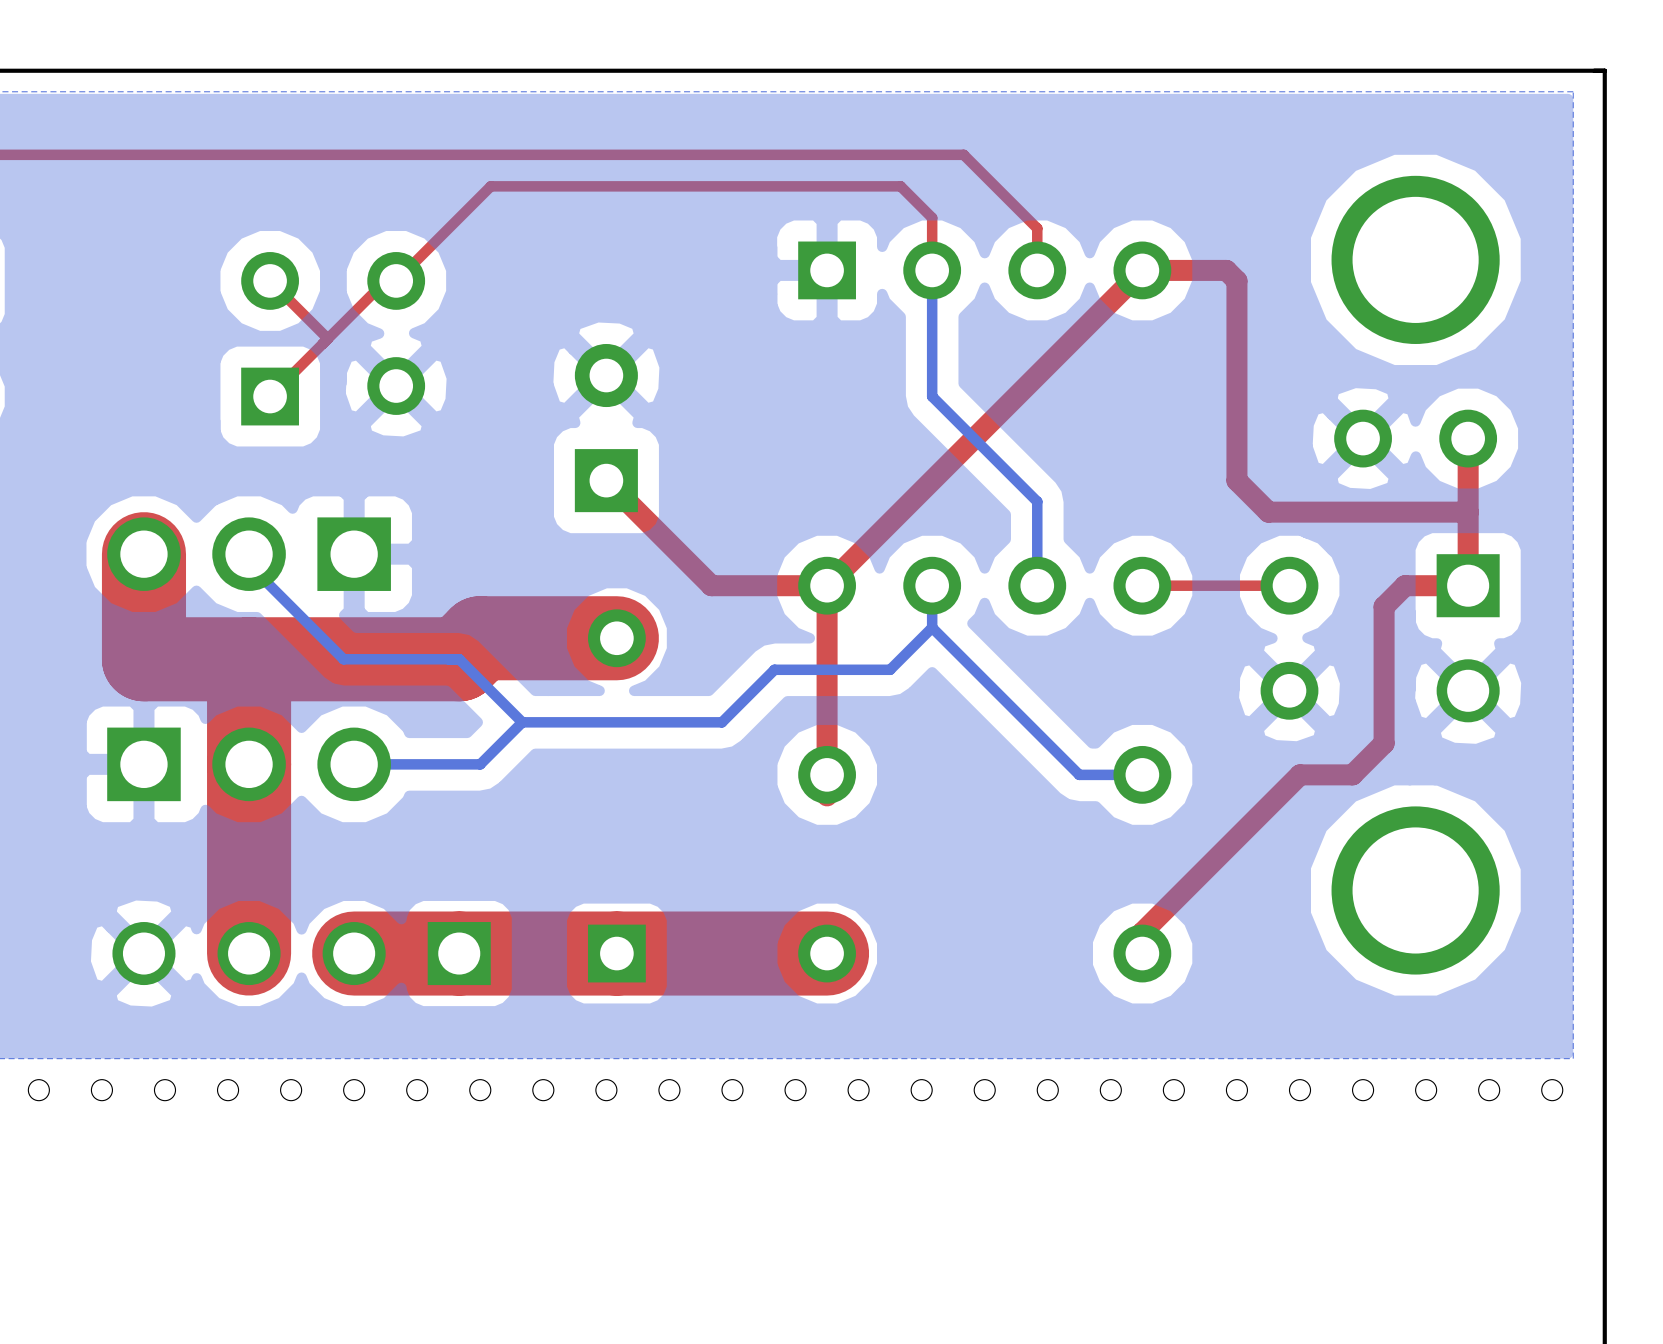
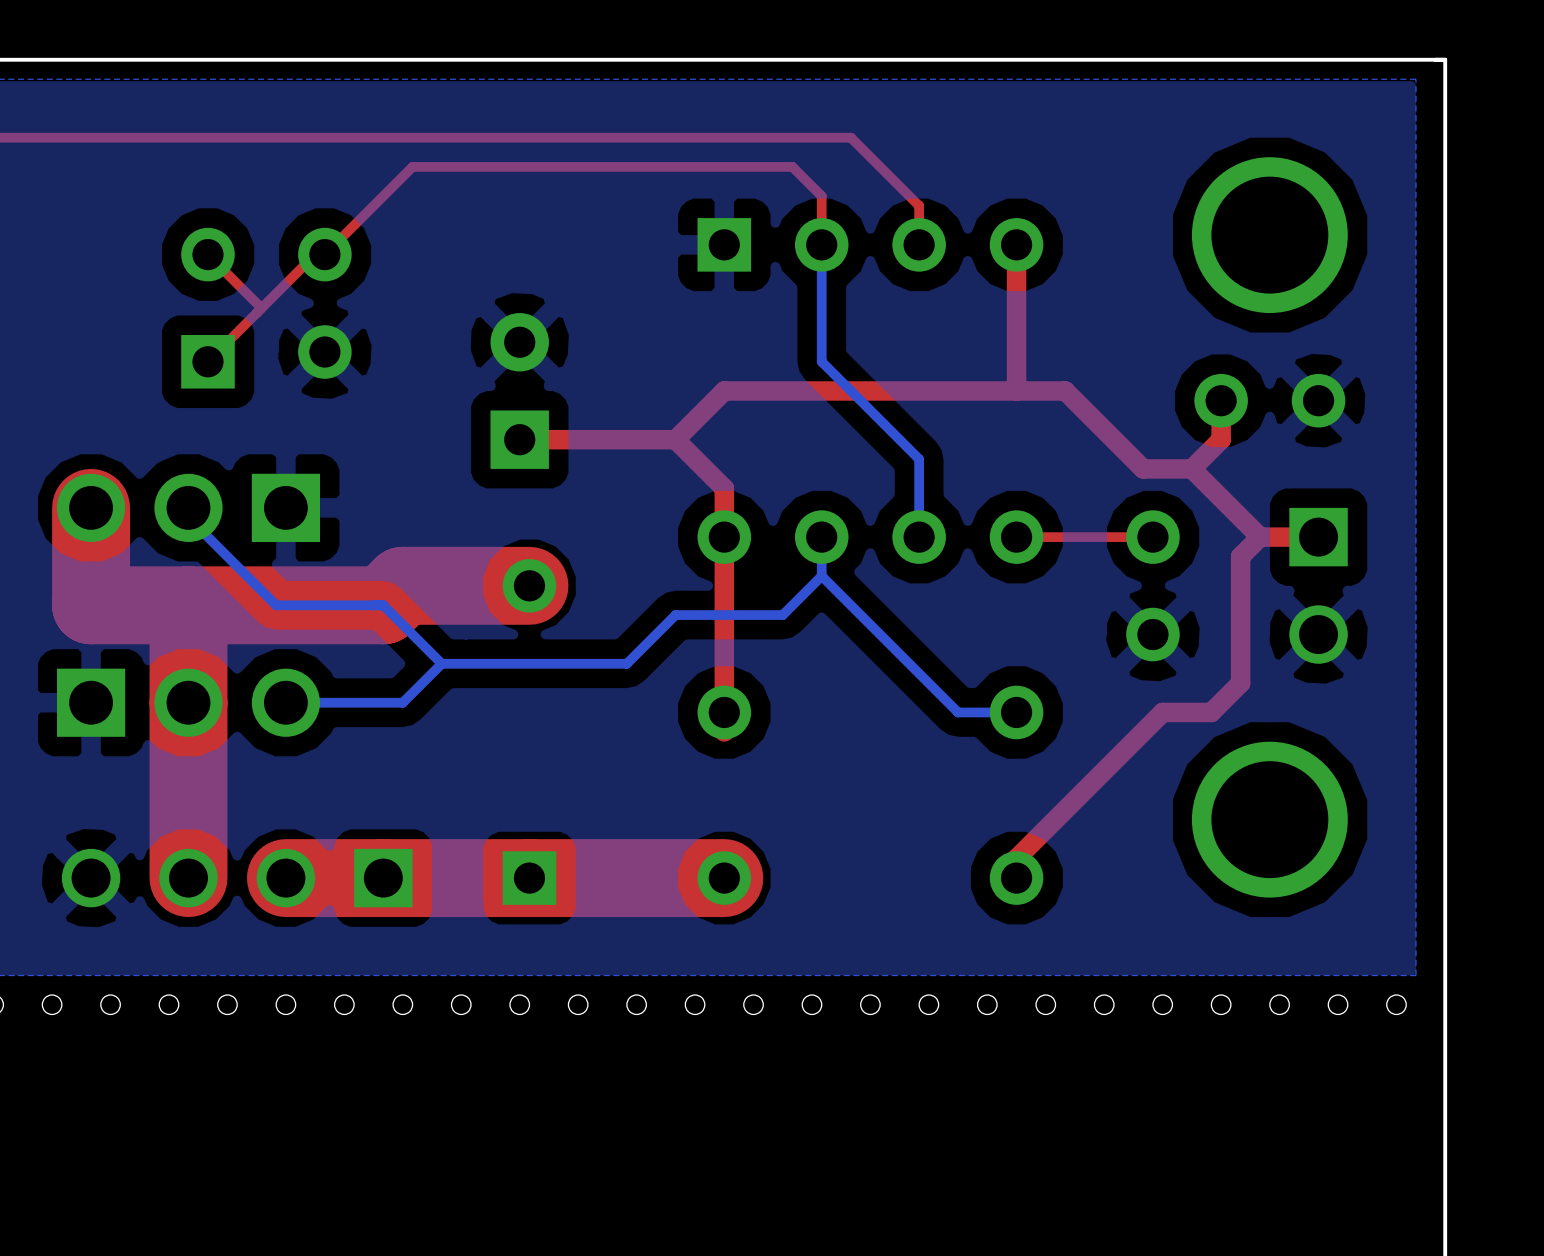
top track: none -> (1016, 244) (1016, 390)
top track: none -> (1221, 400) (1221, 439) (1191, 468) (1260, 537)
top track: (1468, 438) (1468, 585) -> none
top track: (606, 480) (711, 585) (827, 585) (1142, 270) (1226, 270) (1236, 280) (1236, 480) (1268, 512) (1278, 512) -> (675, 439) (724, 390) (1065, 390) (1143, 468)
top track: none -> (675, 439) (724, 488) (724, 527)
top track: none -> (675, 439) (519, 439)
top track: (1468, 512) (1331, 512) -> none

